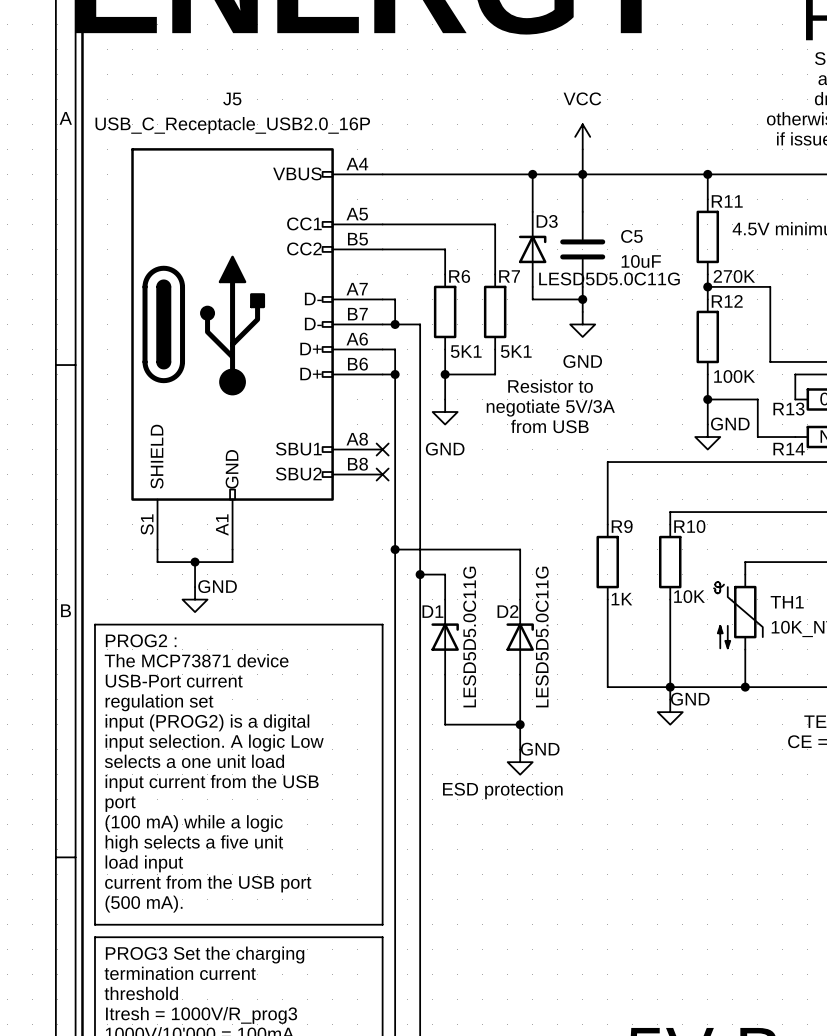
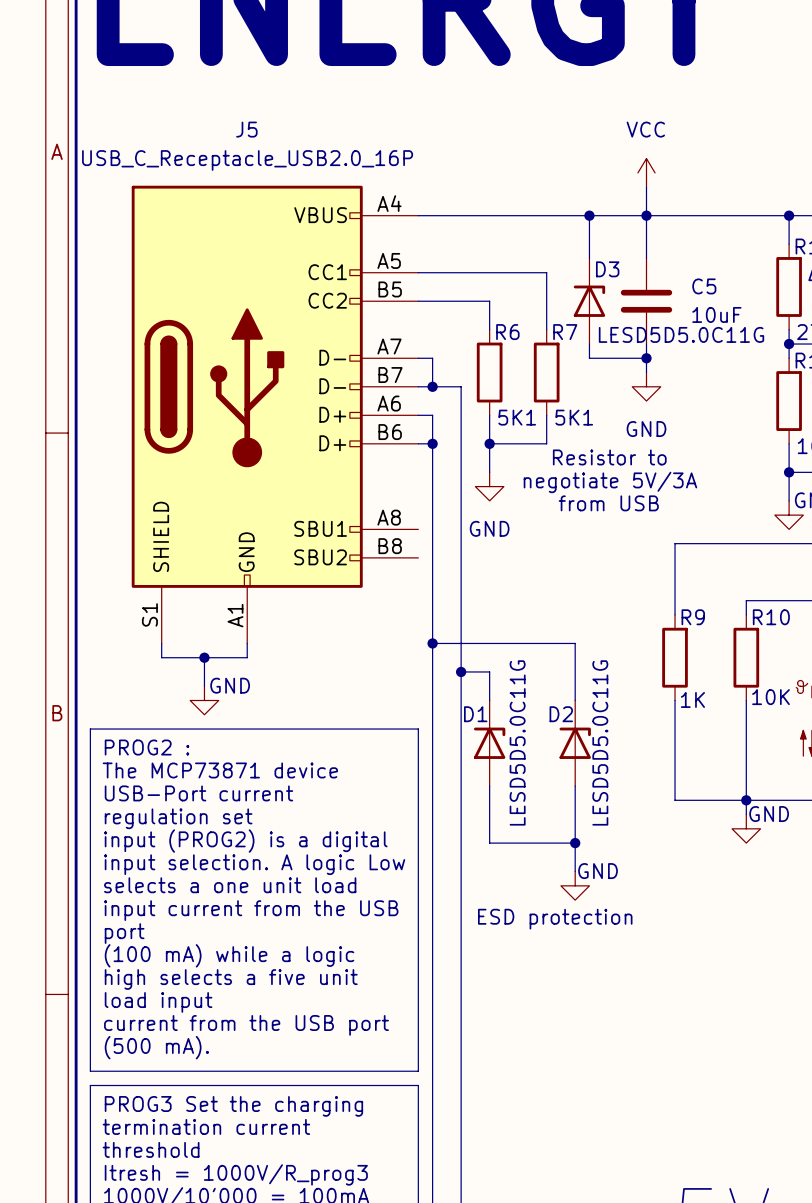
no-connect mark: (382, 449) -> none
no-connect mark: (382, 474) -> none

